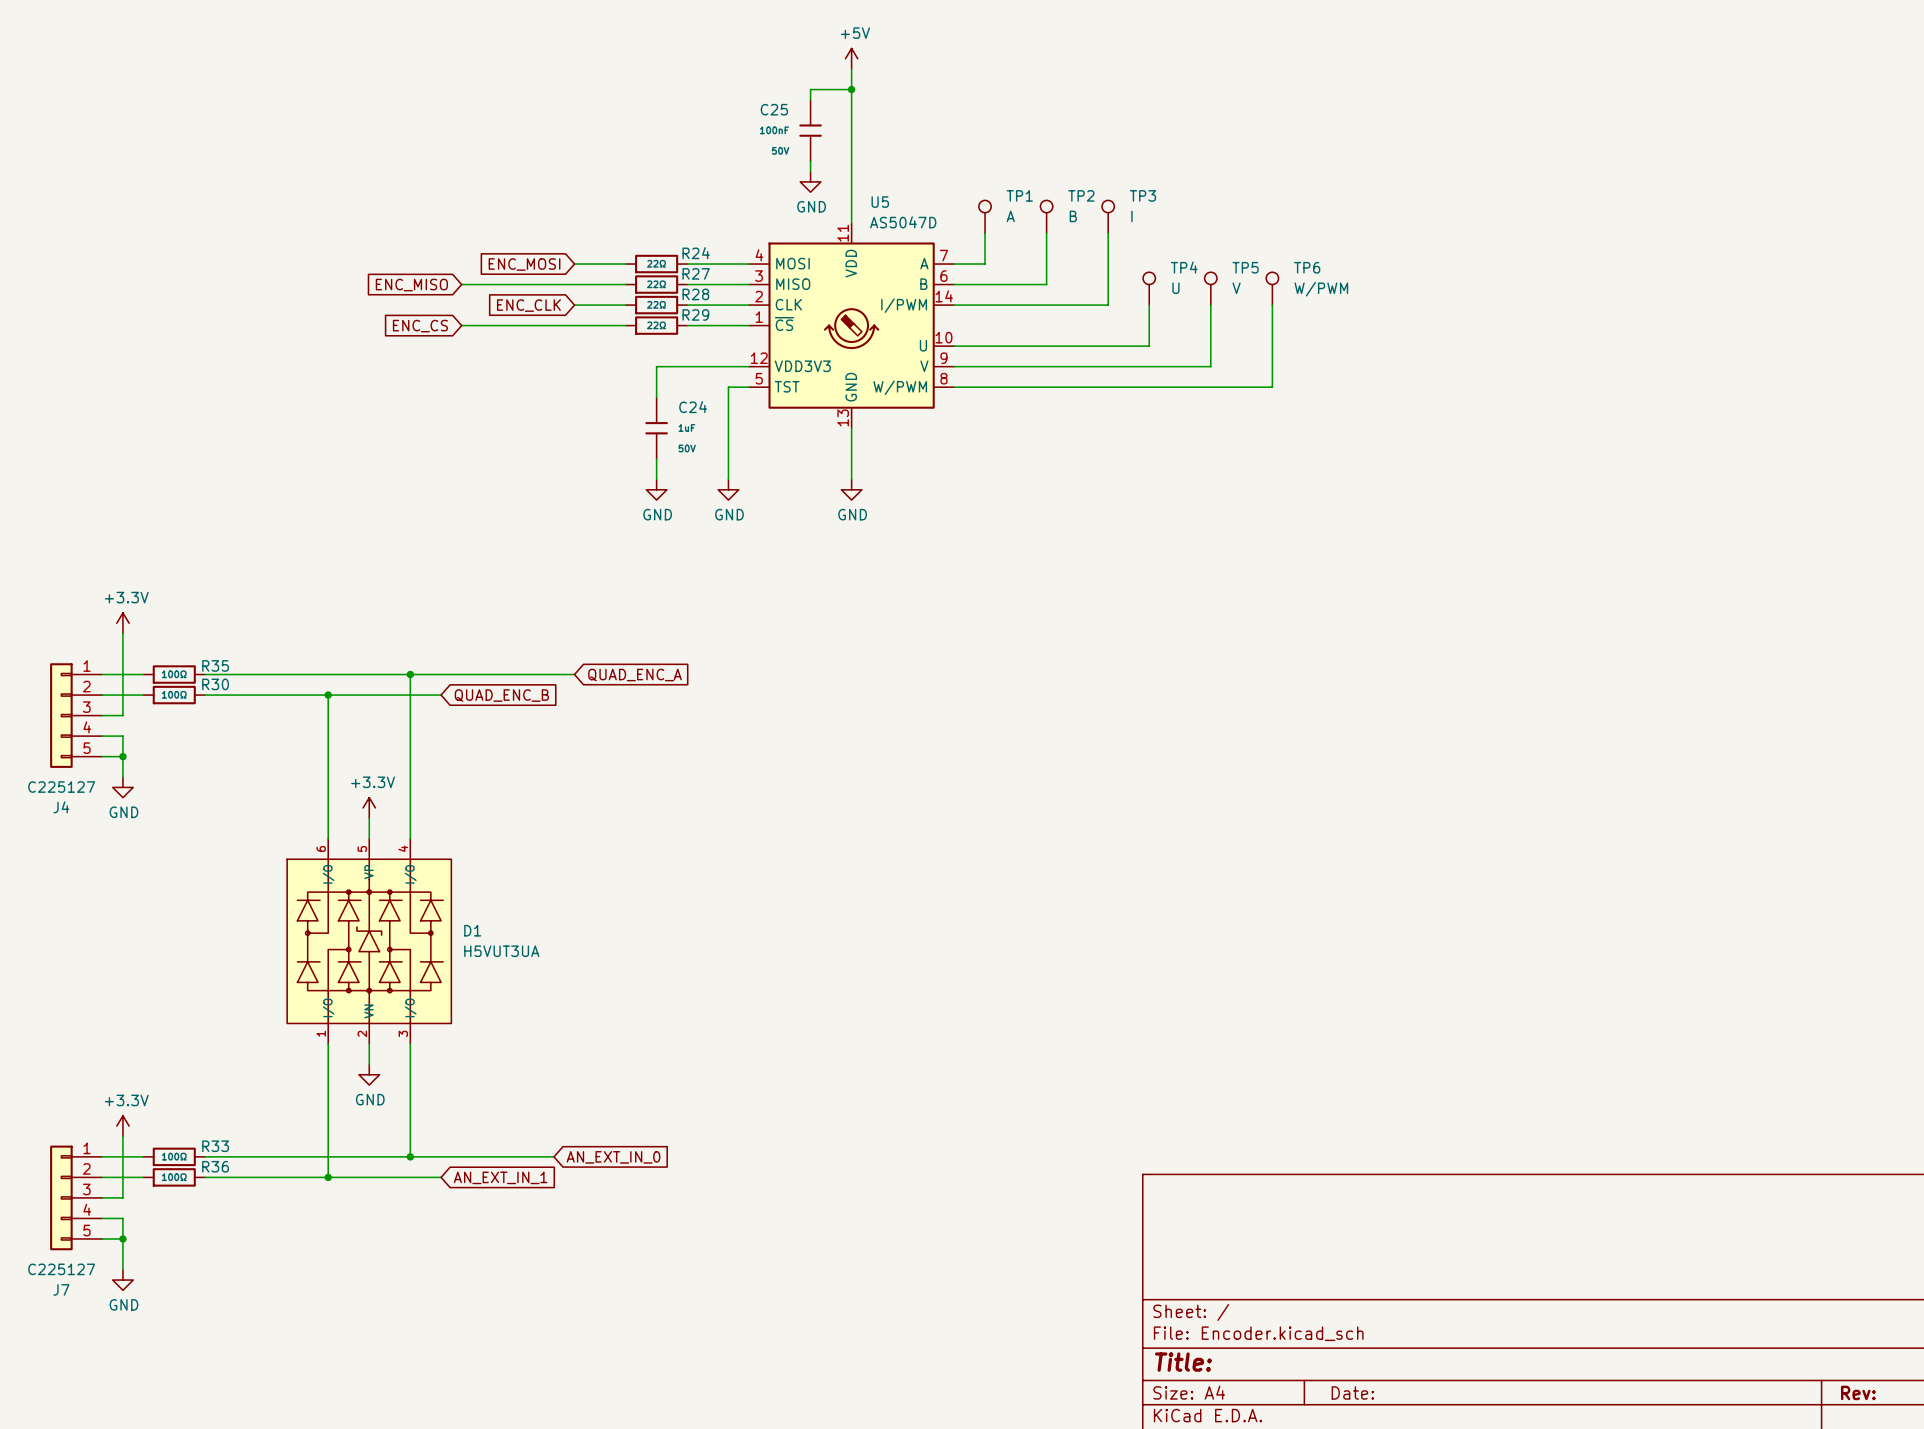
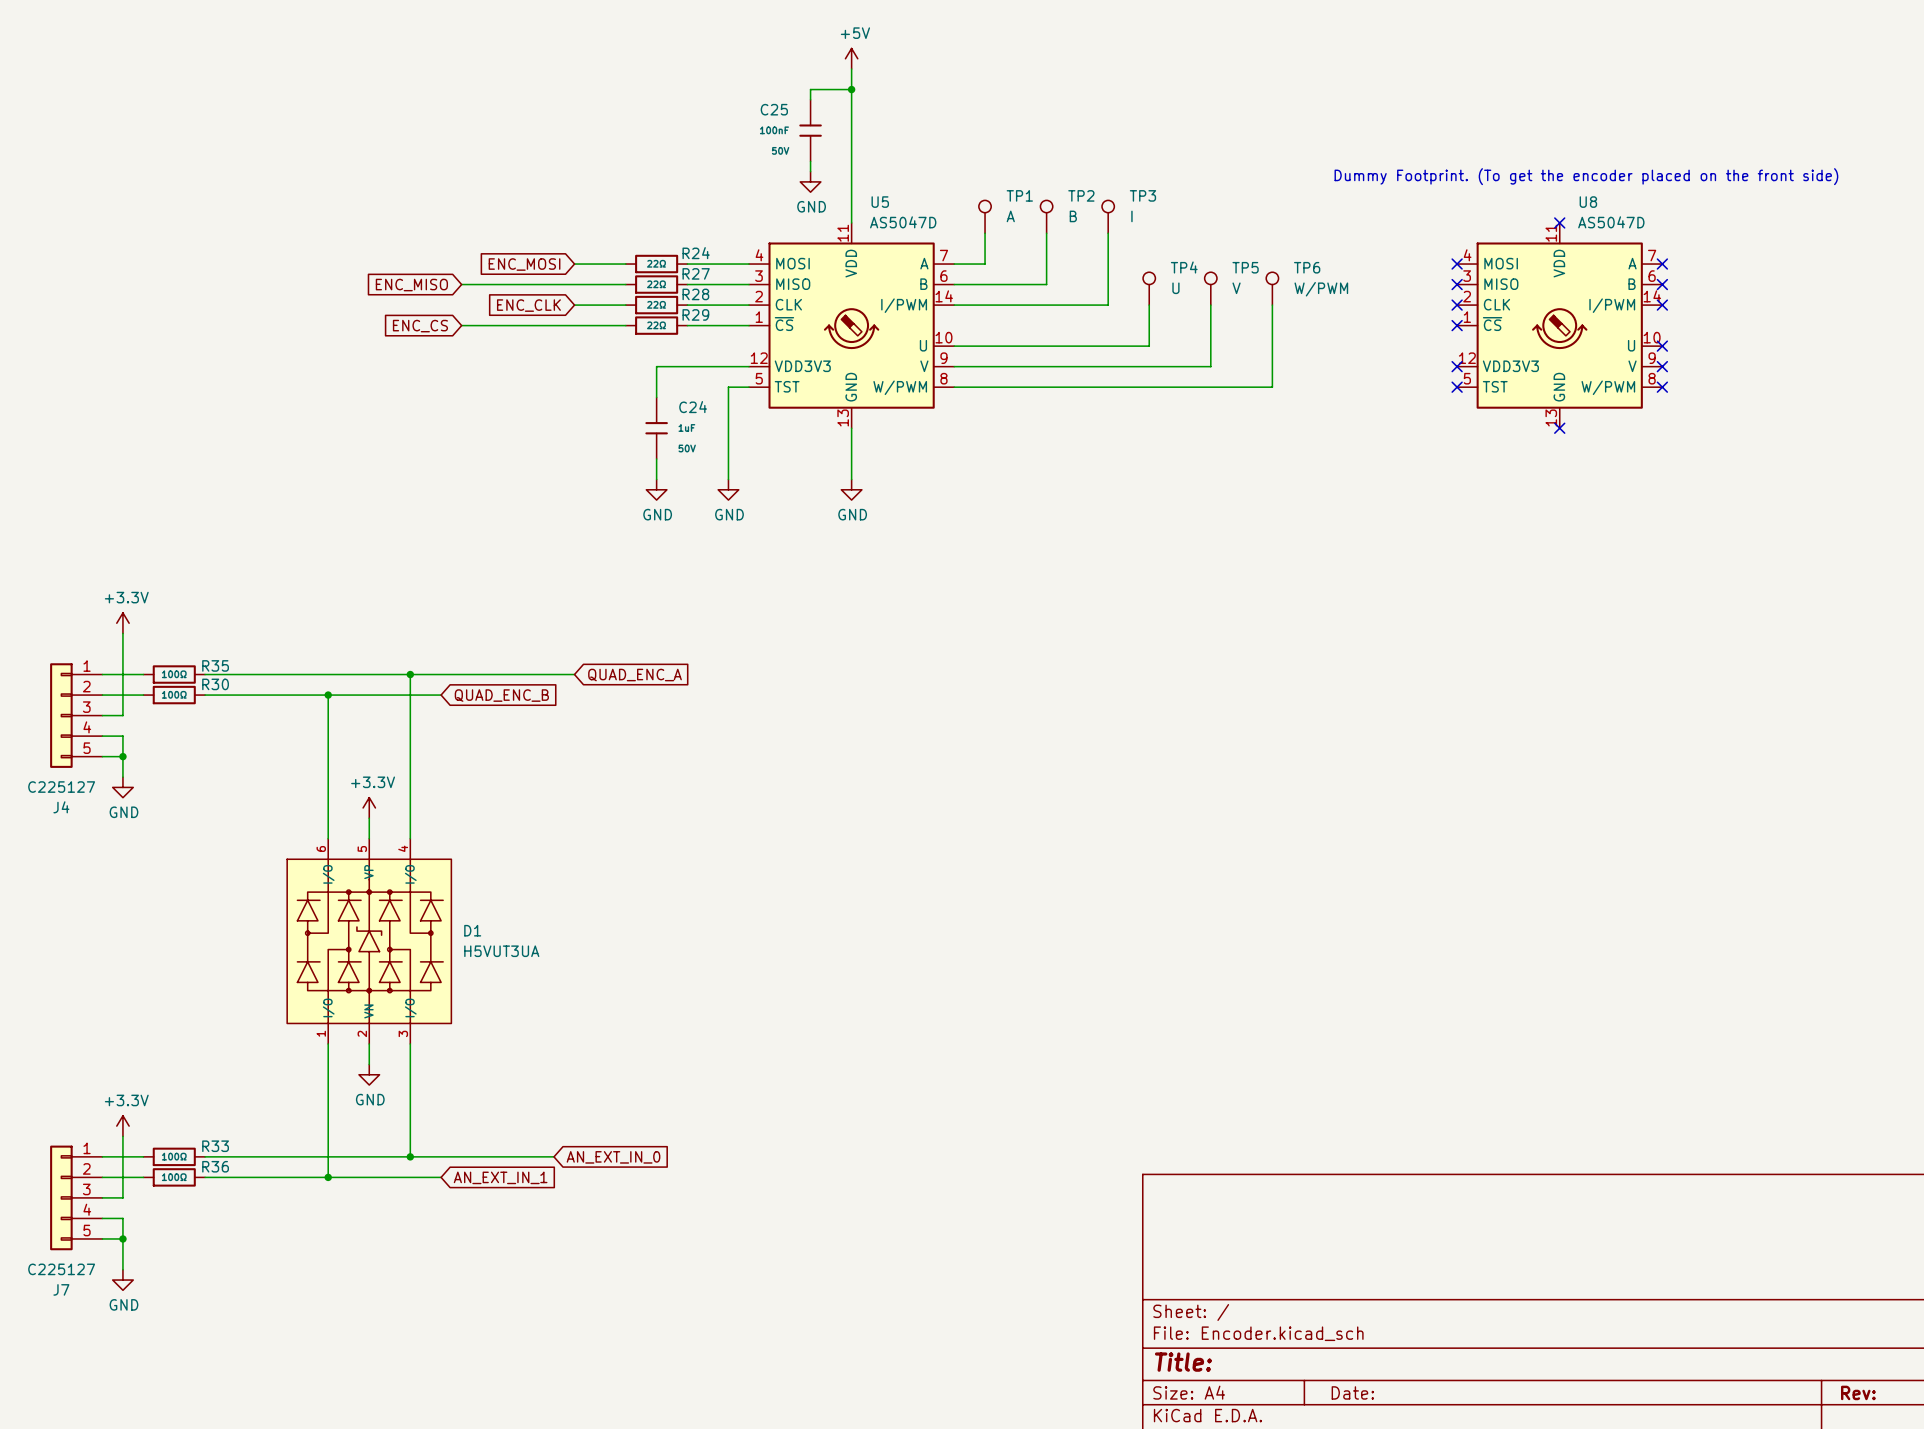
text: none -> Dummy Footprint. (To get the encoder placed on the front side) (1586, 176)
no-connect mark: none -> (1559, 222)
no-connect mark: none -> (1457, 264)
no-connect mark: none -> (1662, 264)
no-connect mark: none -> (1457, 284)
no-connect mark: none -> (1662, 284)
no-connect mark: none -> (1457, 305)
no-connect mark: none -> (1662, 305)
no-connect mark: none -> (1457, 325)
U8: none -> AS5047D (1559, 325)
no-connect mark: none -> (1662, 346)
no-connect mark: none -> (1457, 366)
no-connect mark: none -> (1662, 366)
no-connect mark: none -> (1457, 387)
no-connect mark: none -> (1662, 387)
no-connect mark: none -> (1559, 428)

